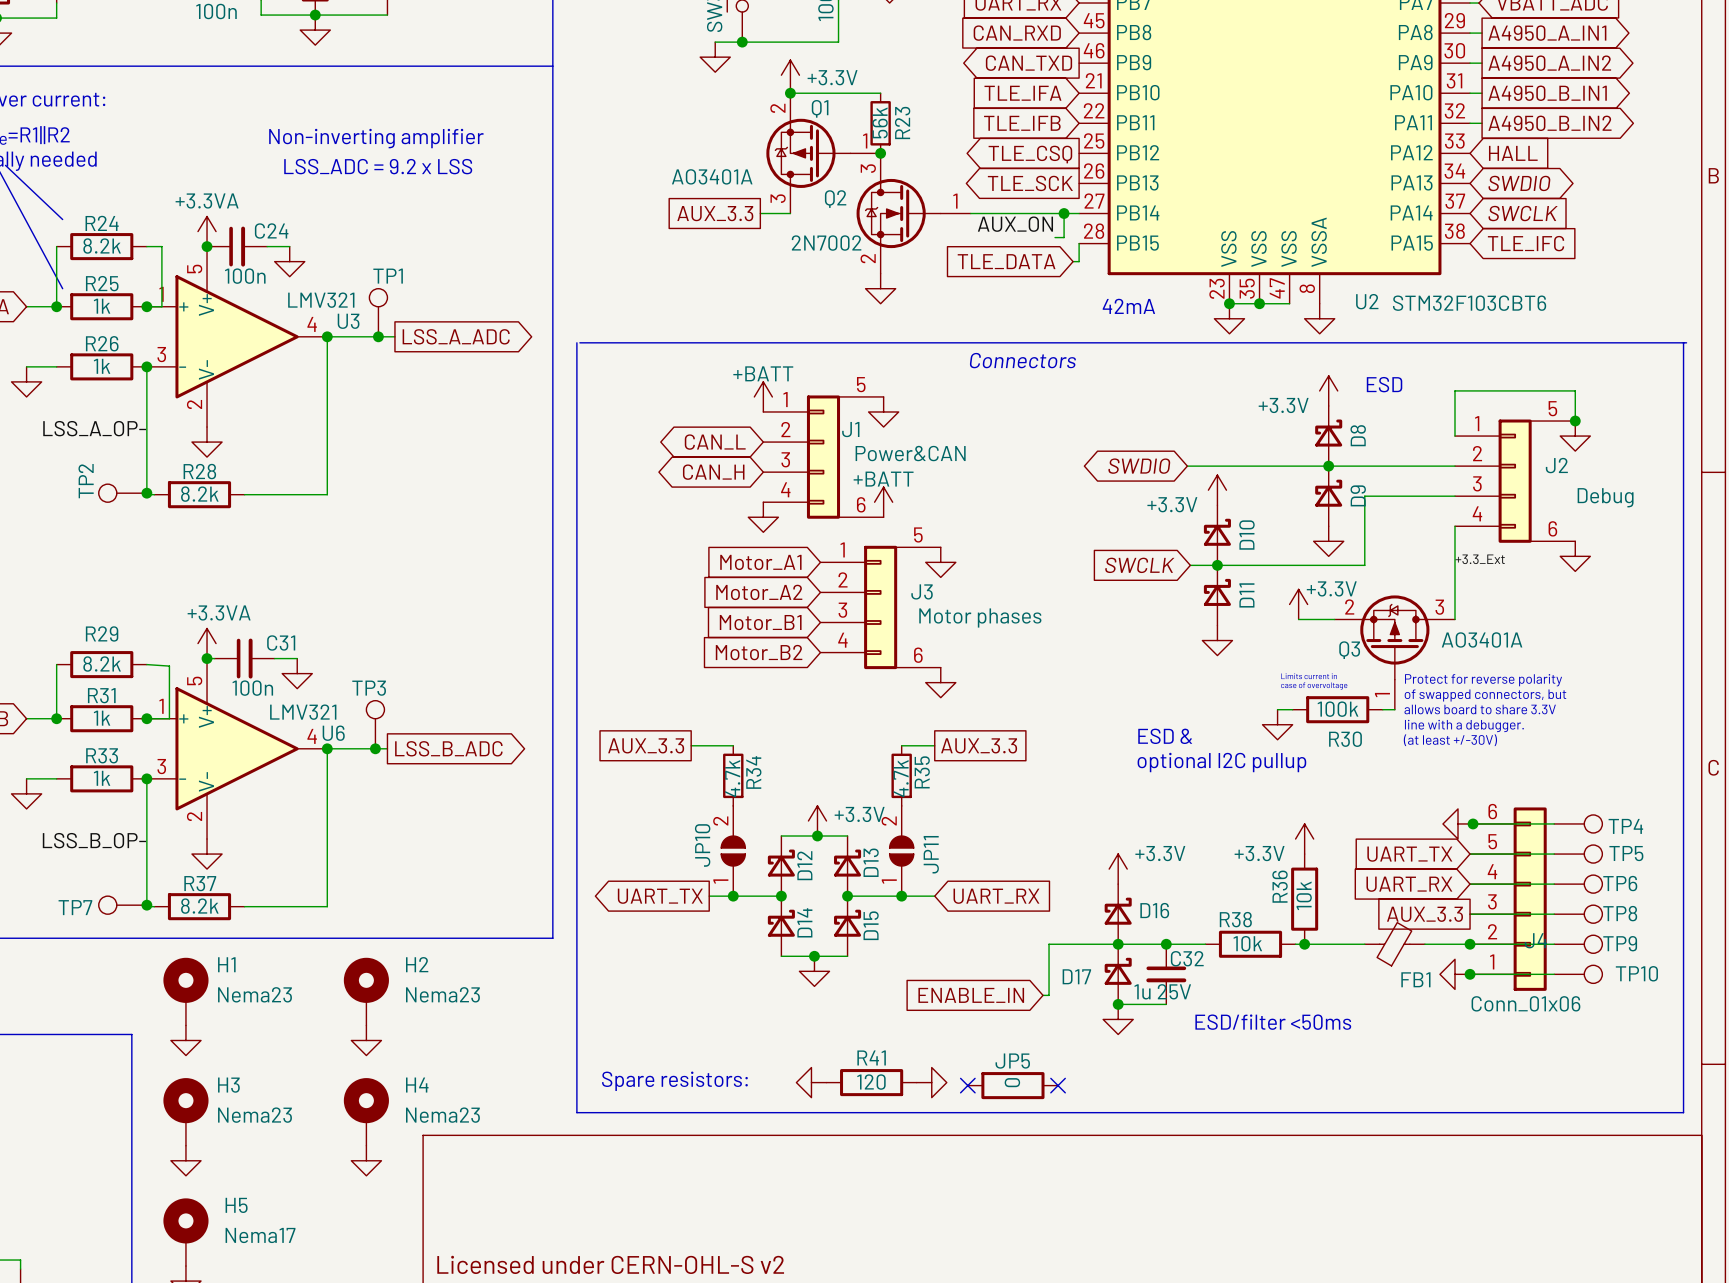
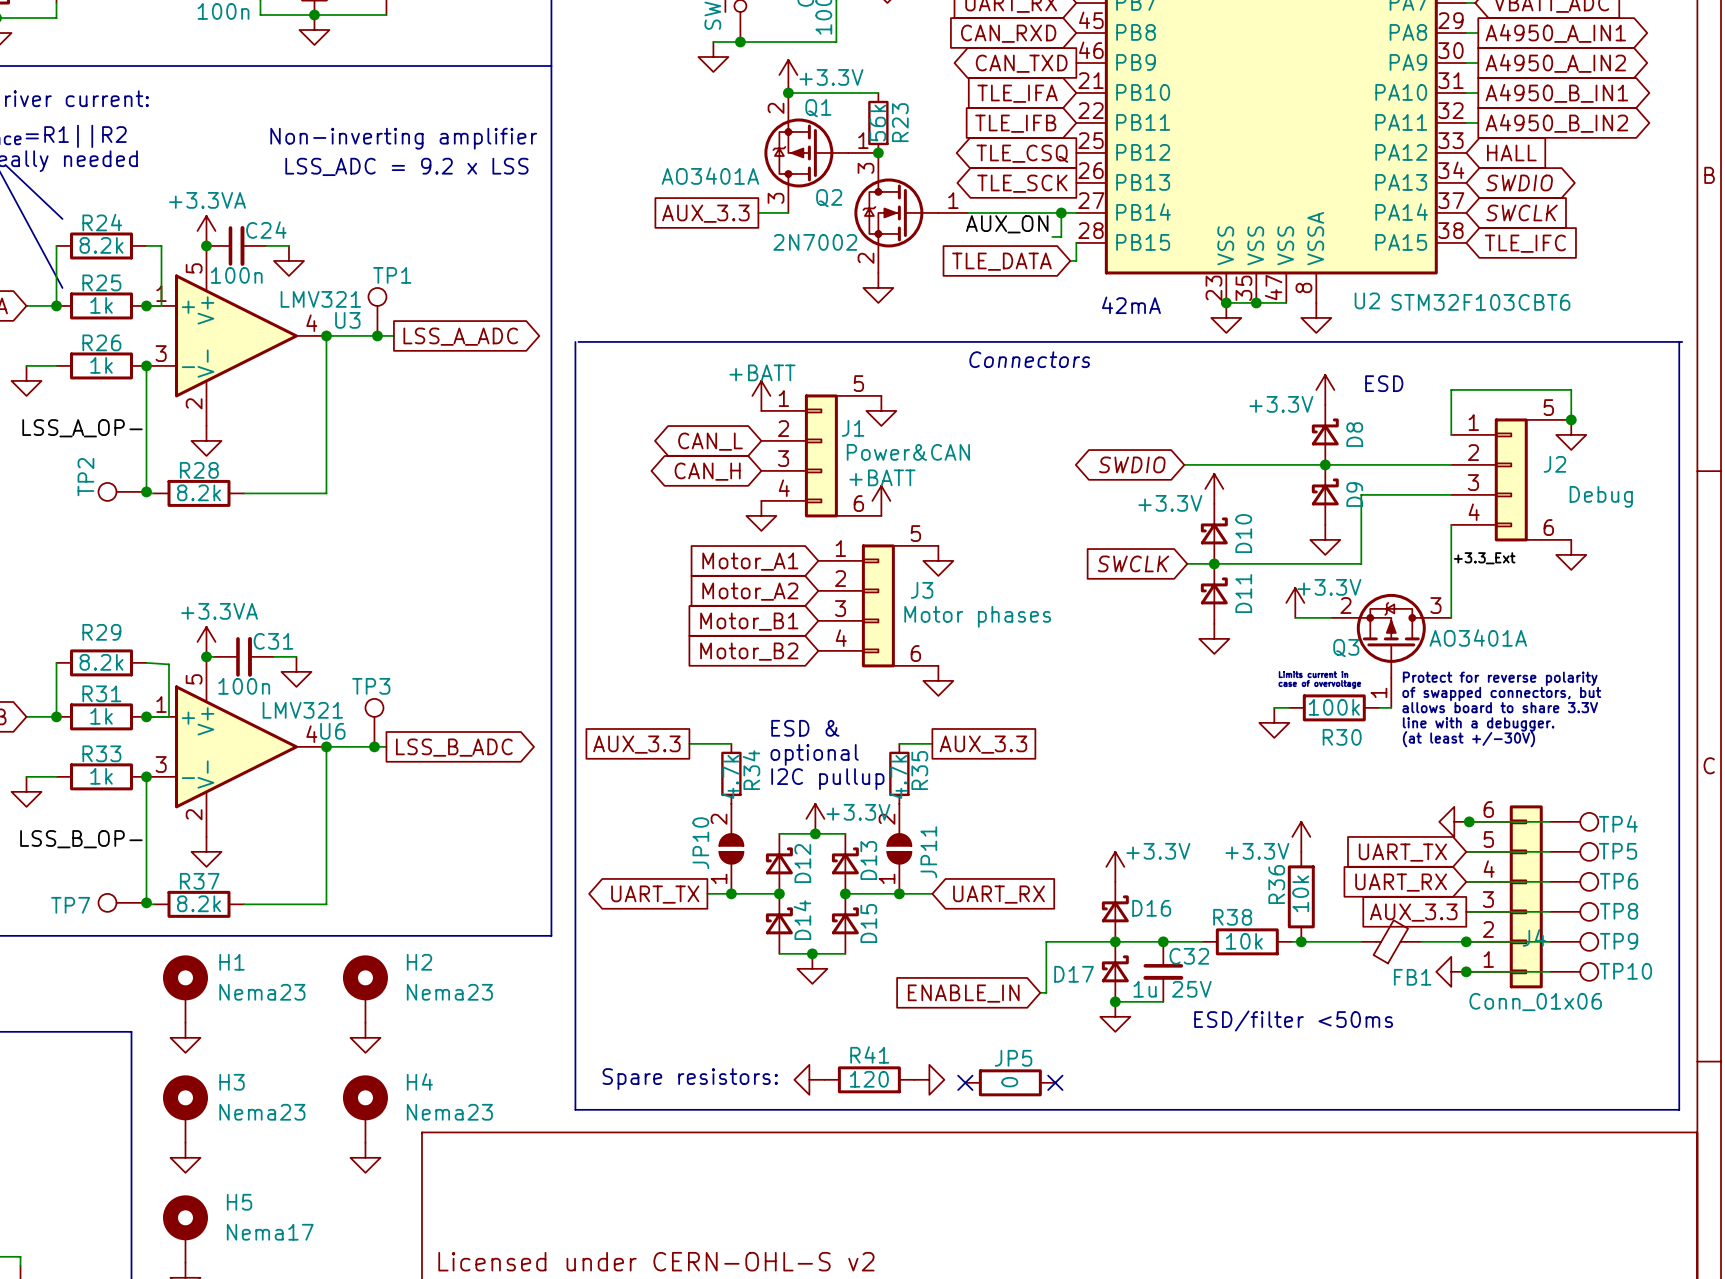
text: none -> ESD & (805, 728)
text: ESD & (1165, 736) -> none
text: none -> optional (814, 754)
text: optional I2C pullup (1221, 762) -> none
text: none -> I2C pullup (827, 779)

